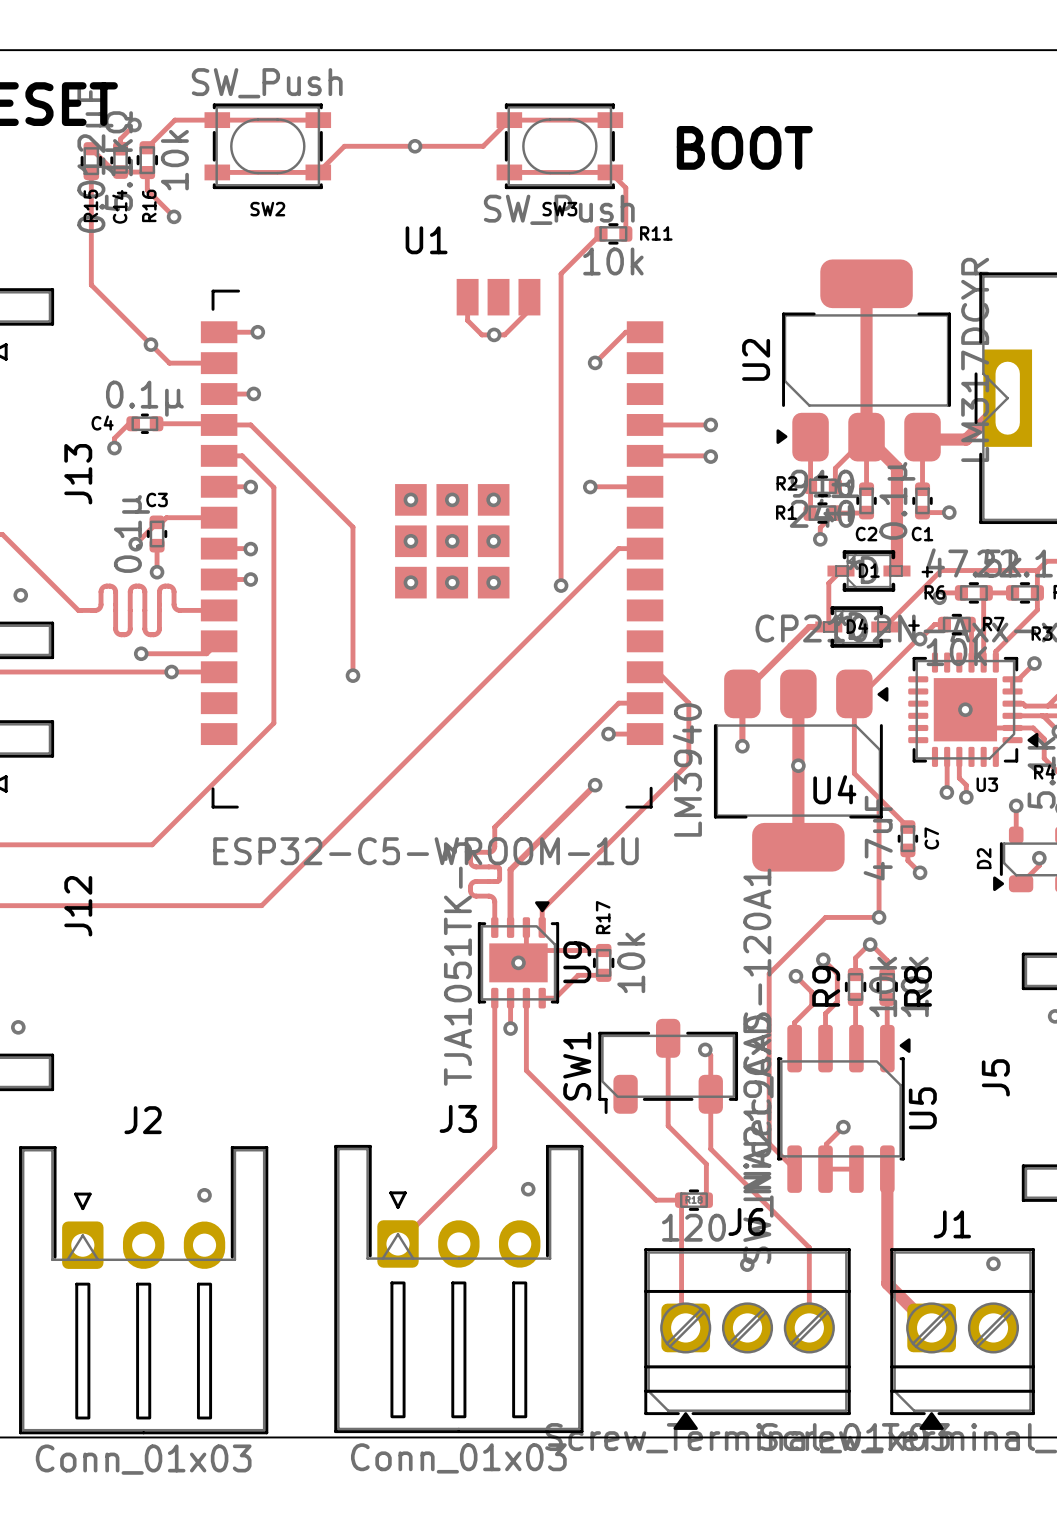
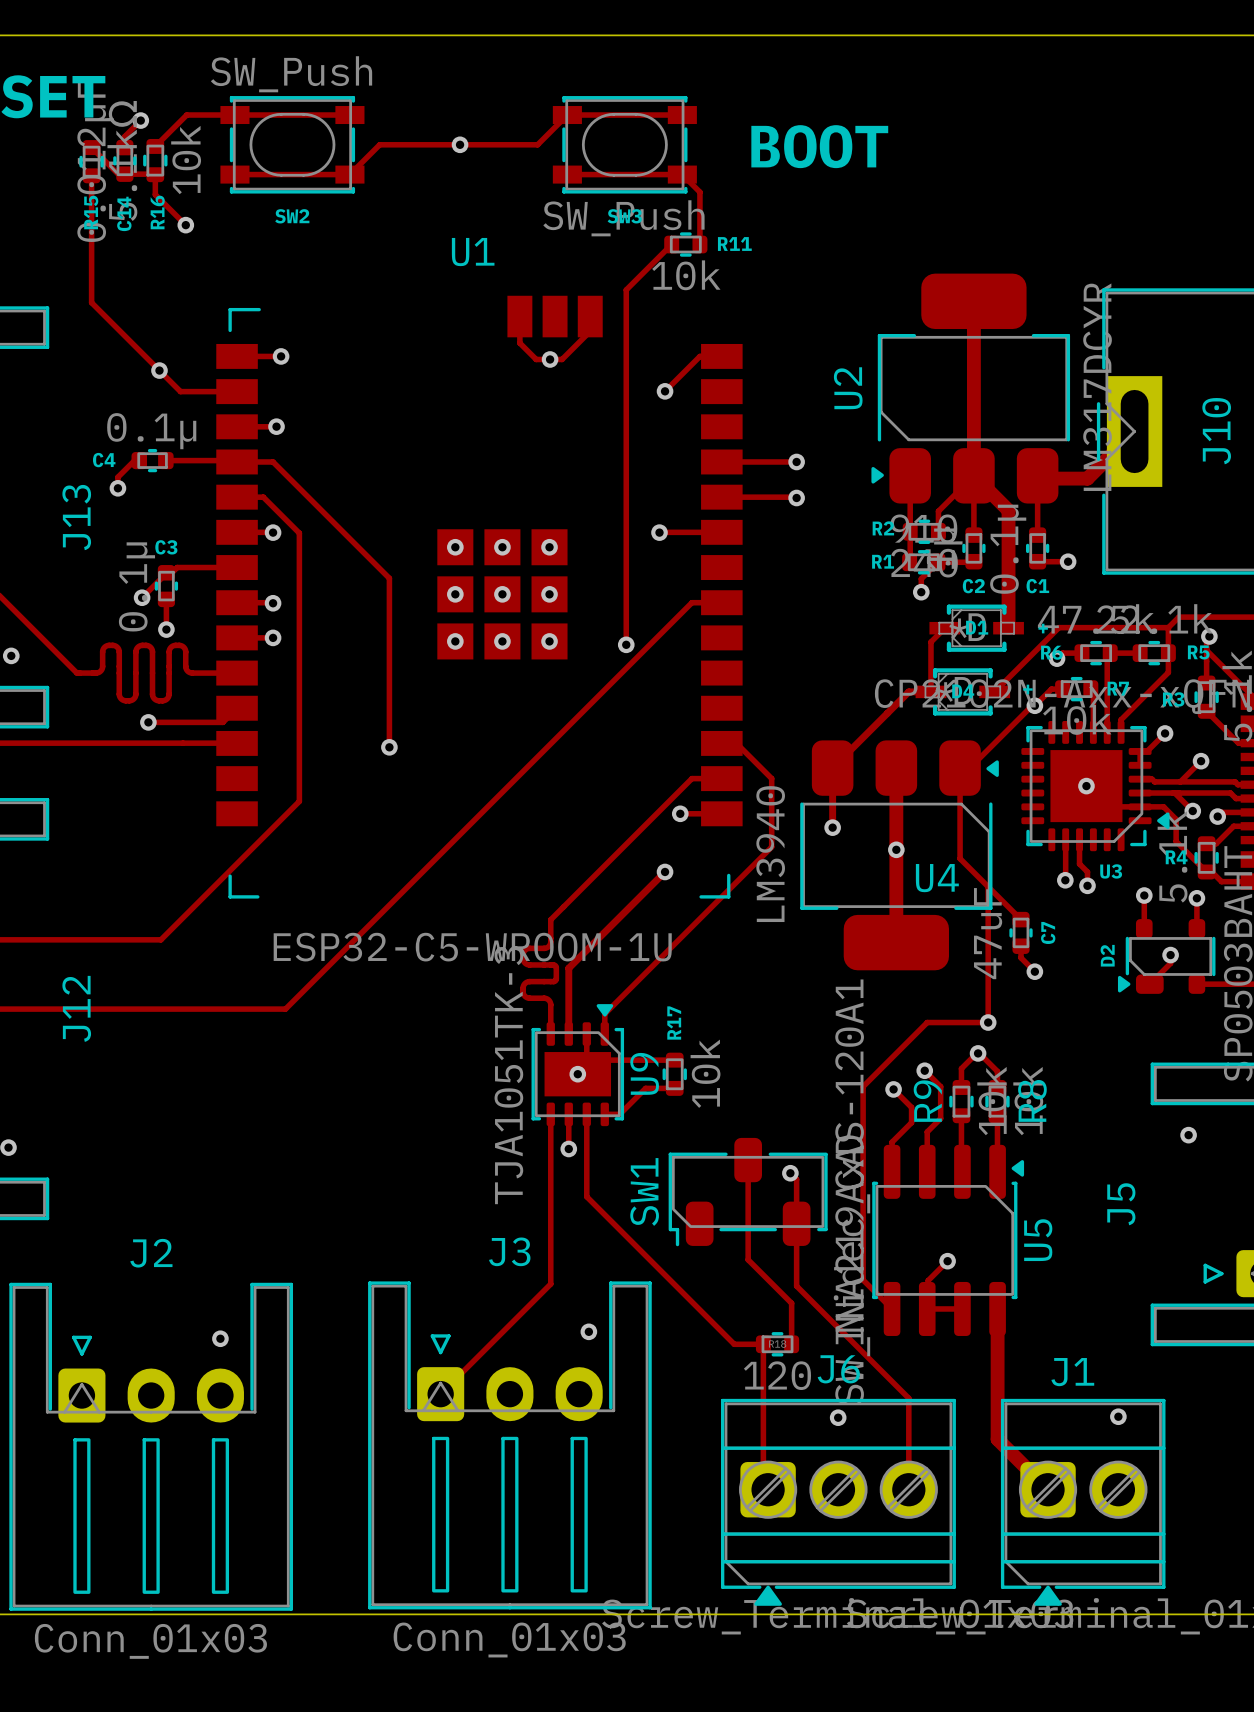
via: (171, 672) -> none

